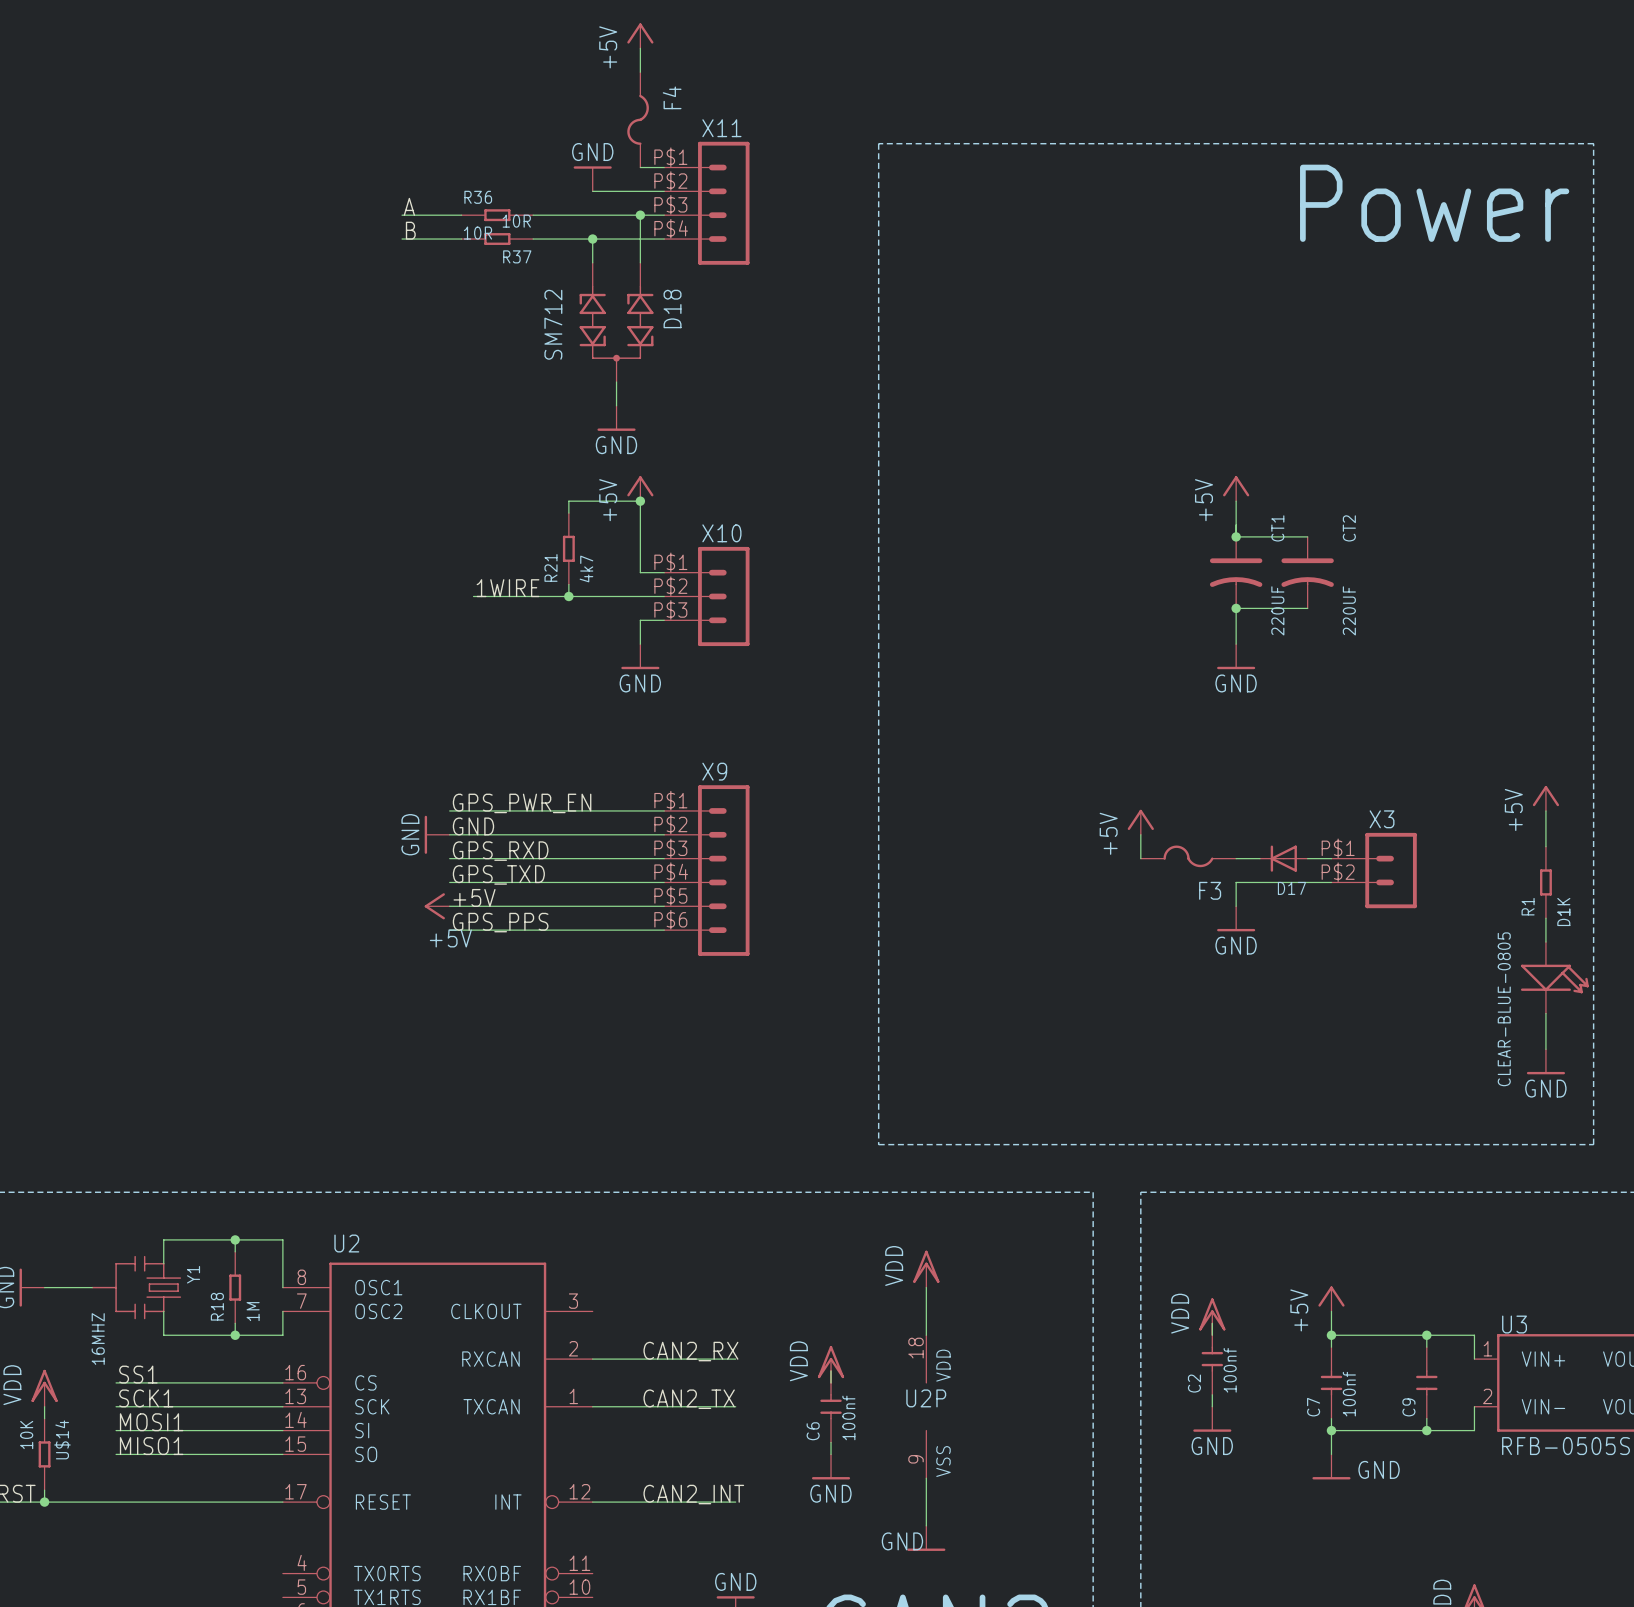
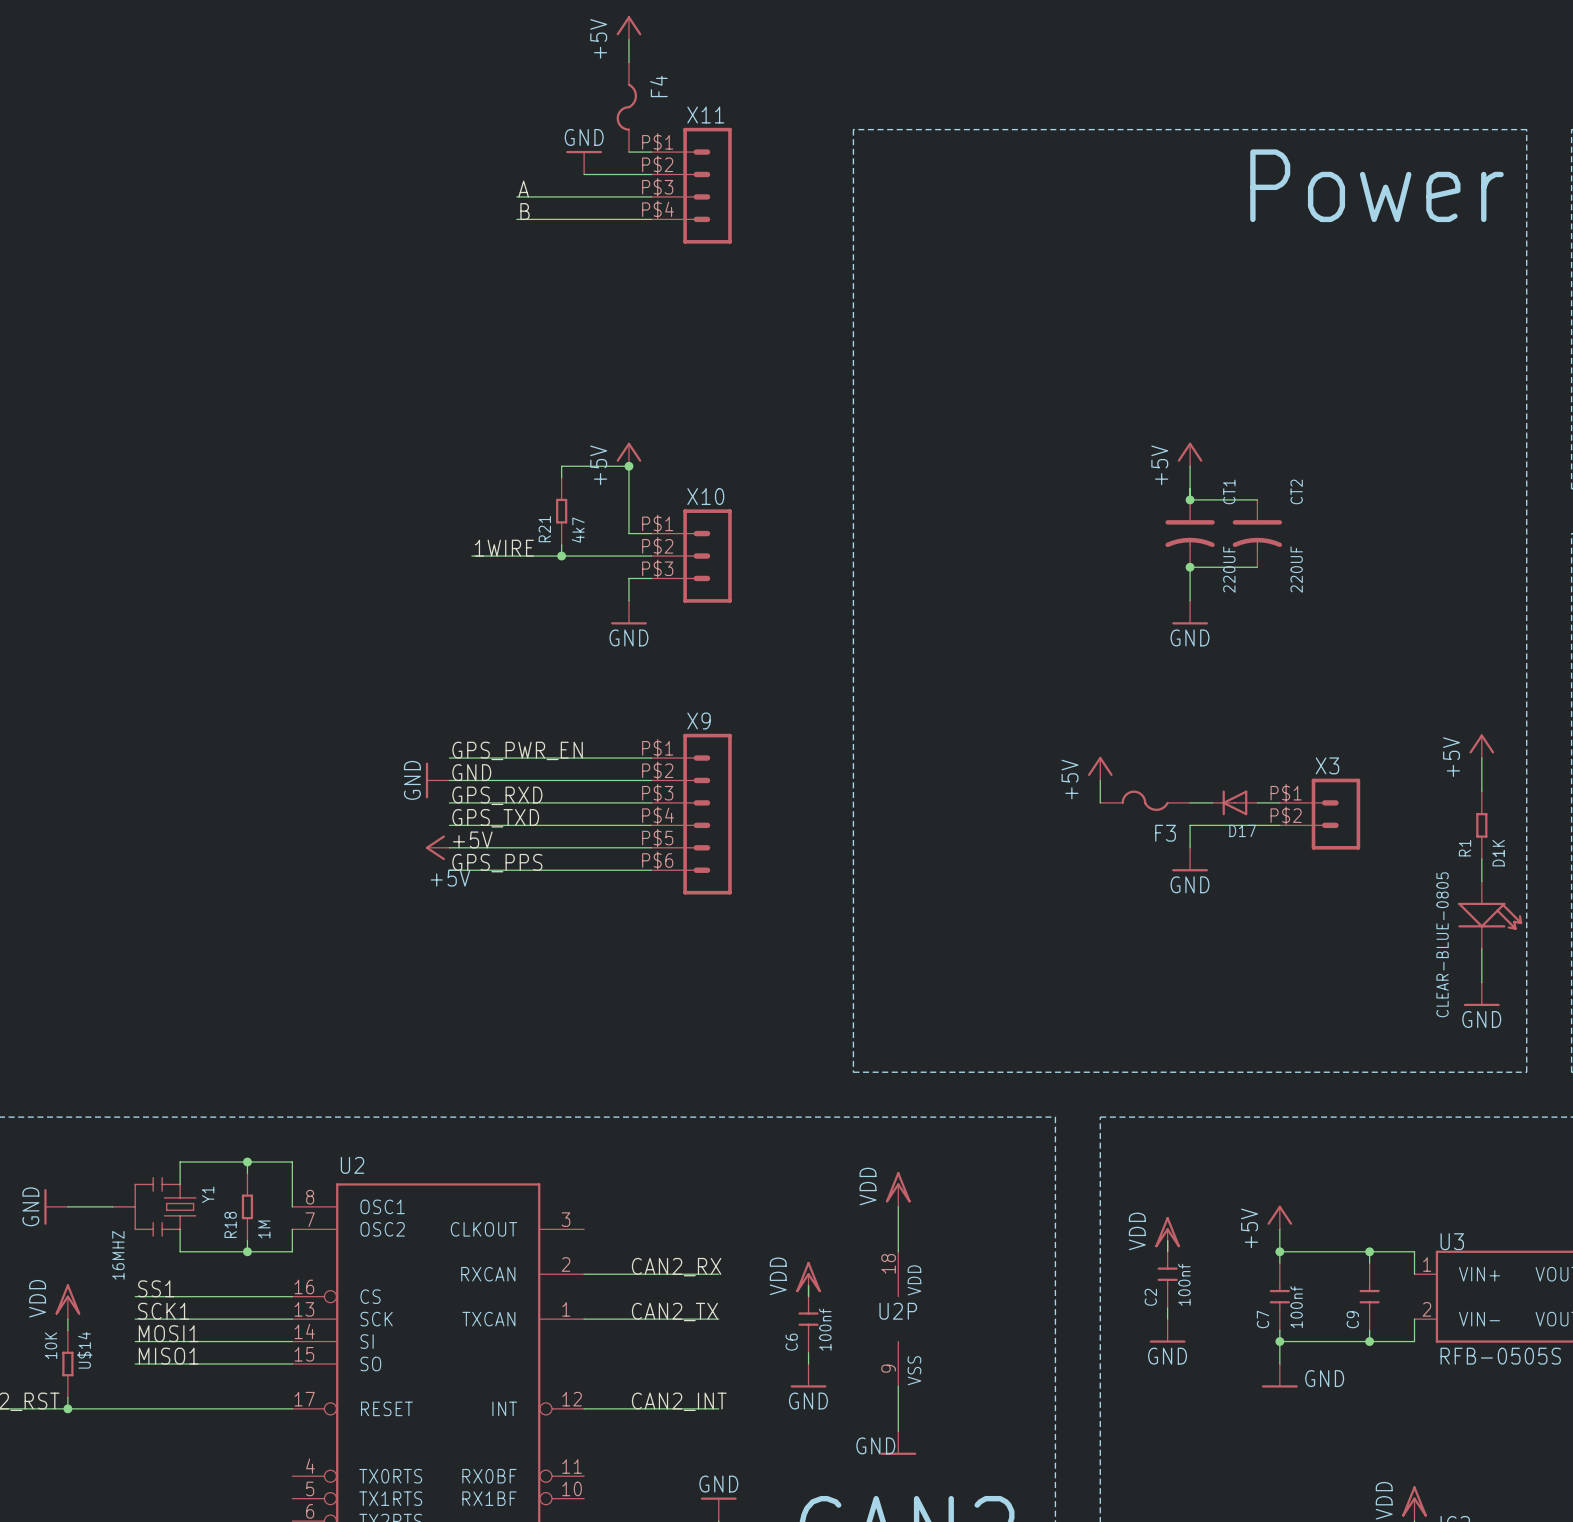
label position: A (409, 206) -> A (523, 189)
wire: (402, 215) (461, 215) -> none
R36: 10R (497, 215) -> none
wire: (640, 215) (640, 262) -> none
junction: (640, 215) -> none
label position: B (410, 230) -> B (525, 211)
wire: (402, 239) (461, 239) -> none
R37: 10R (497, 239) -> none
wire: (592, 239) (592, 262) -> none
junction: (592, 239) -> none
D18: SM712 (616, 322) -> none
wire: (616, 382) (616, 405) -> none
power symbol: GND (616, 418) -> none

